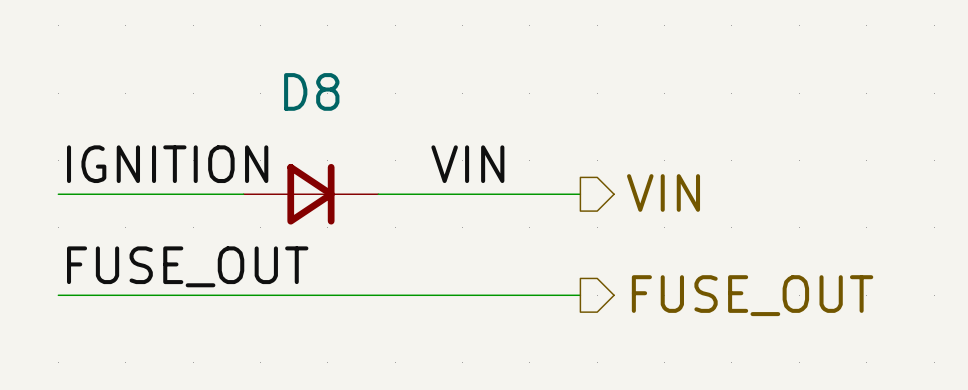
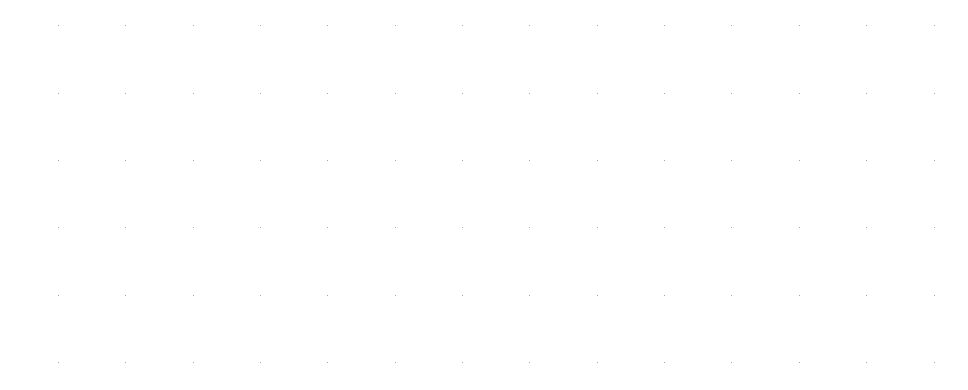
label: IGNITION (167, 164) -> none
label: VIN (467, 164) -> none
hierarchical label: VIN (663, 192) -> none
wire: (58, 194) (243, 194) -> none
D8: (310, 194) -> none
wire: (378, 194) (580, 194) -> none
label: FUSE_OUT (187, 266) -> none
wire: (58, 295) (580, 295) -> none
hierarchical label: FUSE_OUT (752, 295) -> none

